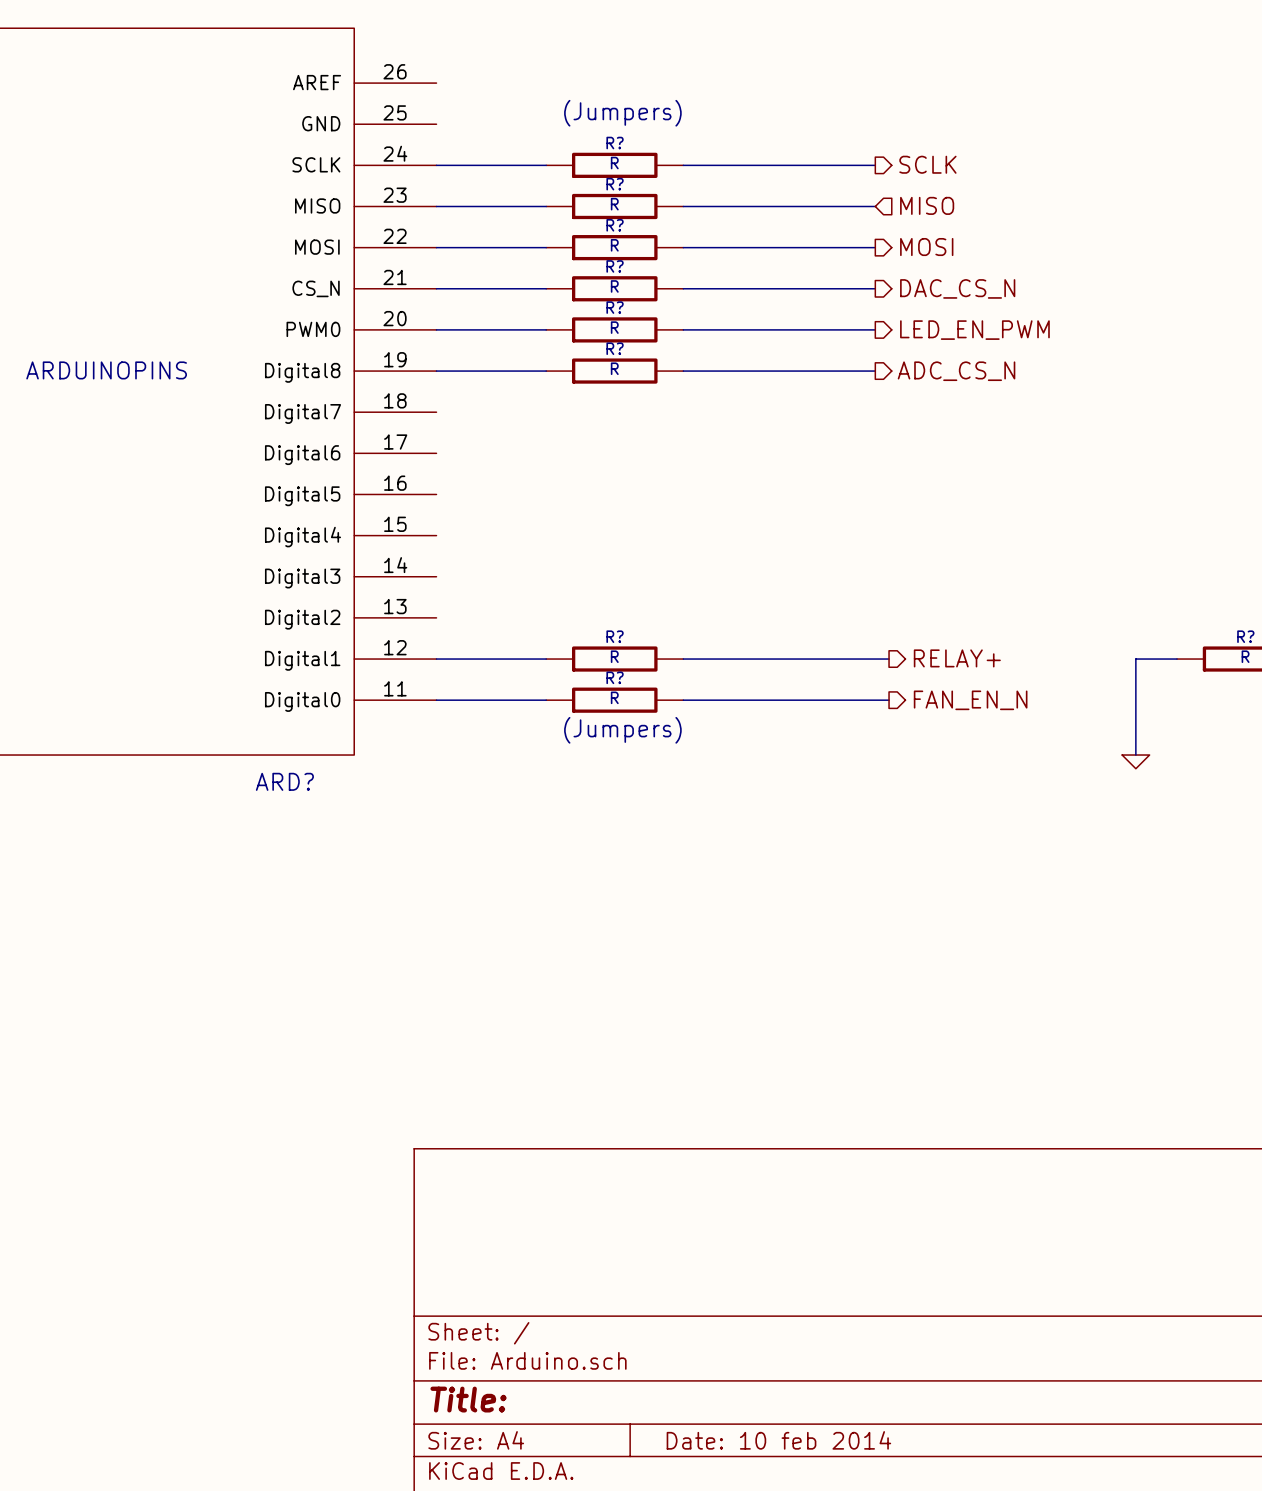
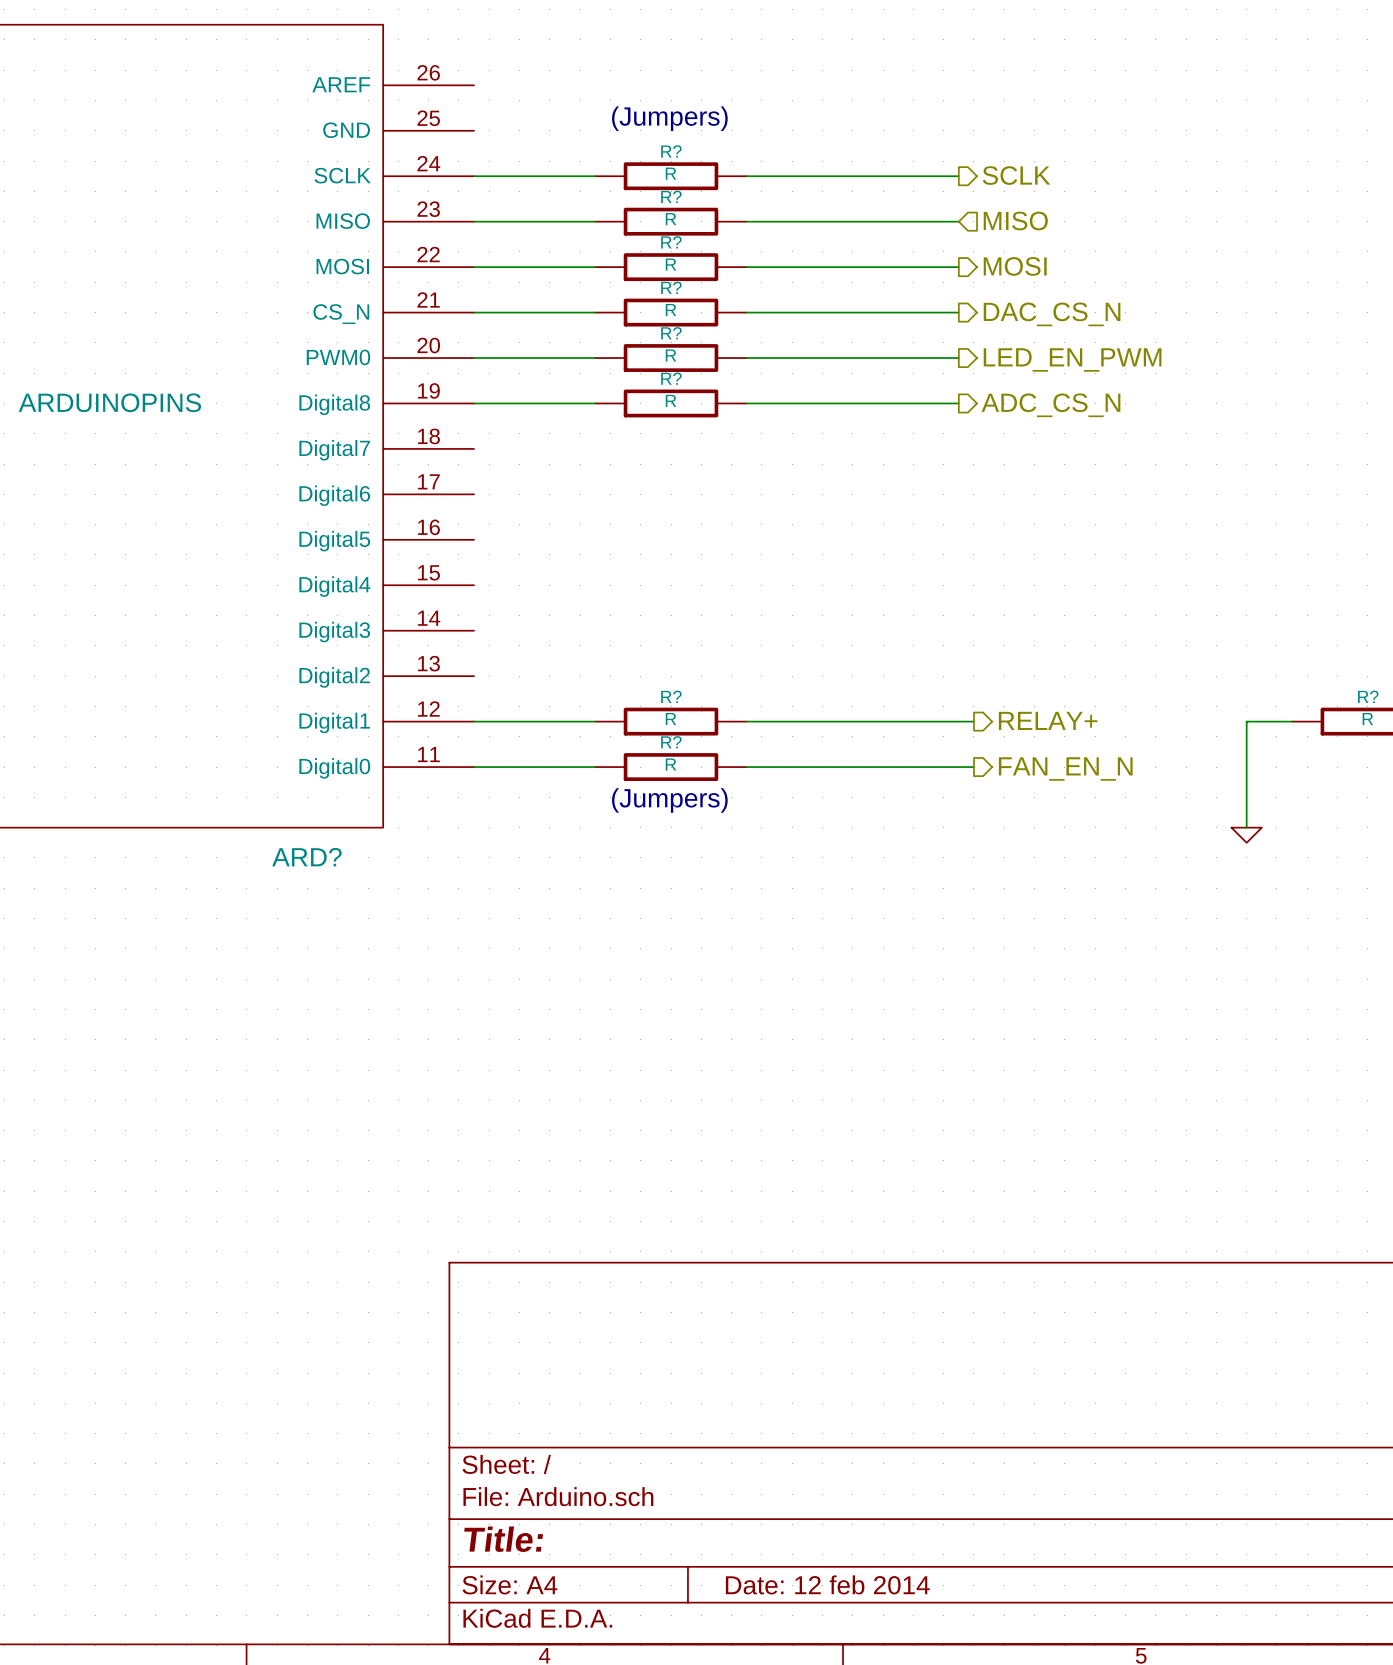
title block: Date: 10 feb 2014 (778, 1440) -> Date: 12 feb 2014 (827, 1584)

